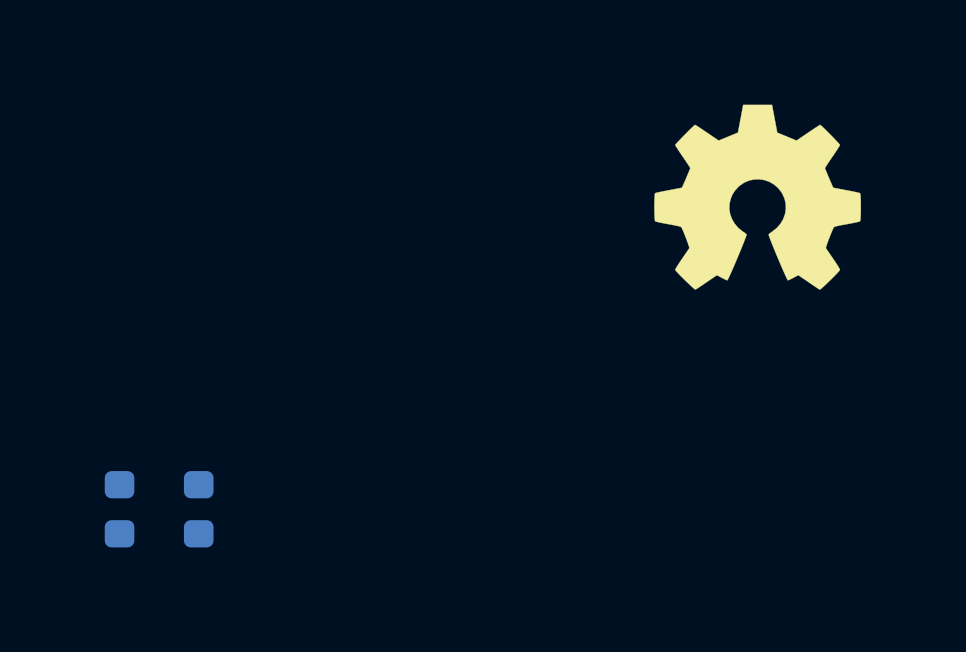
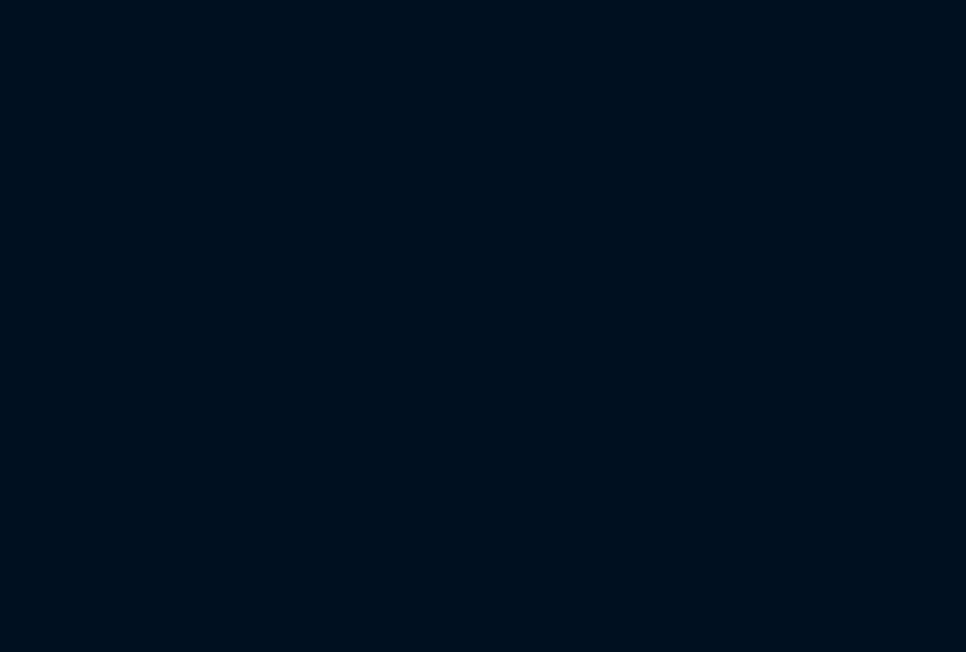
drawing: [654, 104, 861, 290] -> none
part: (119, 509) -> none
part: (198, 509) -> none

